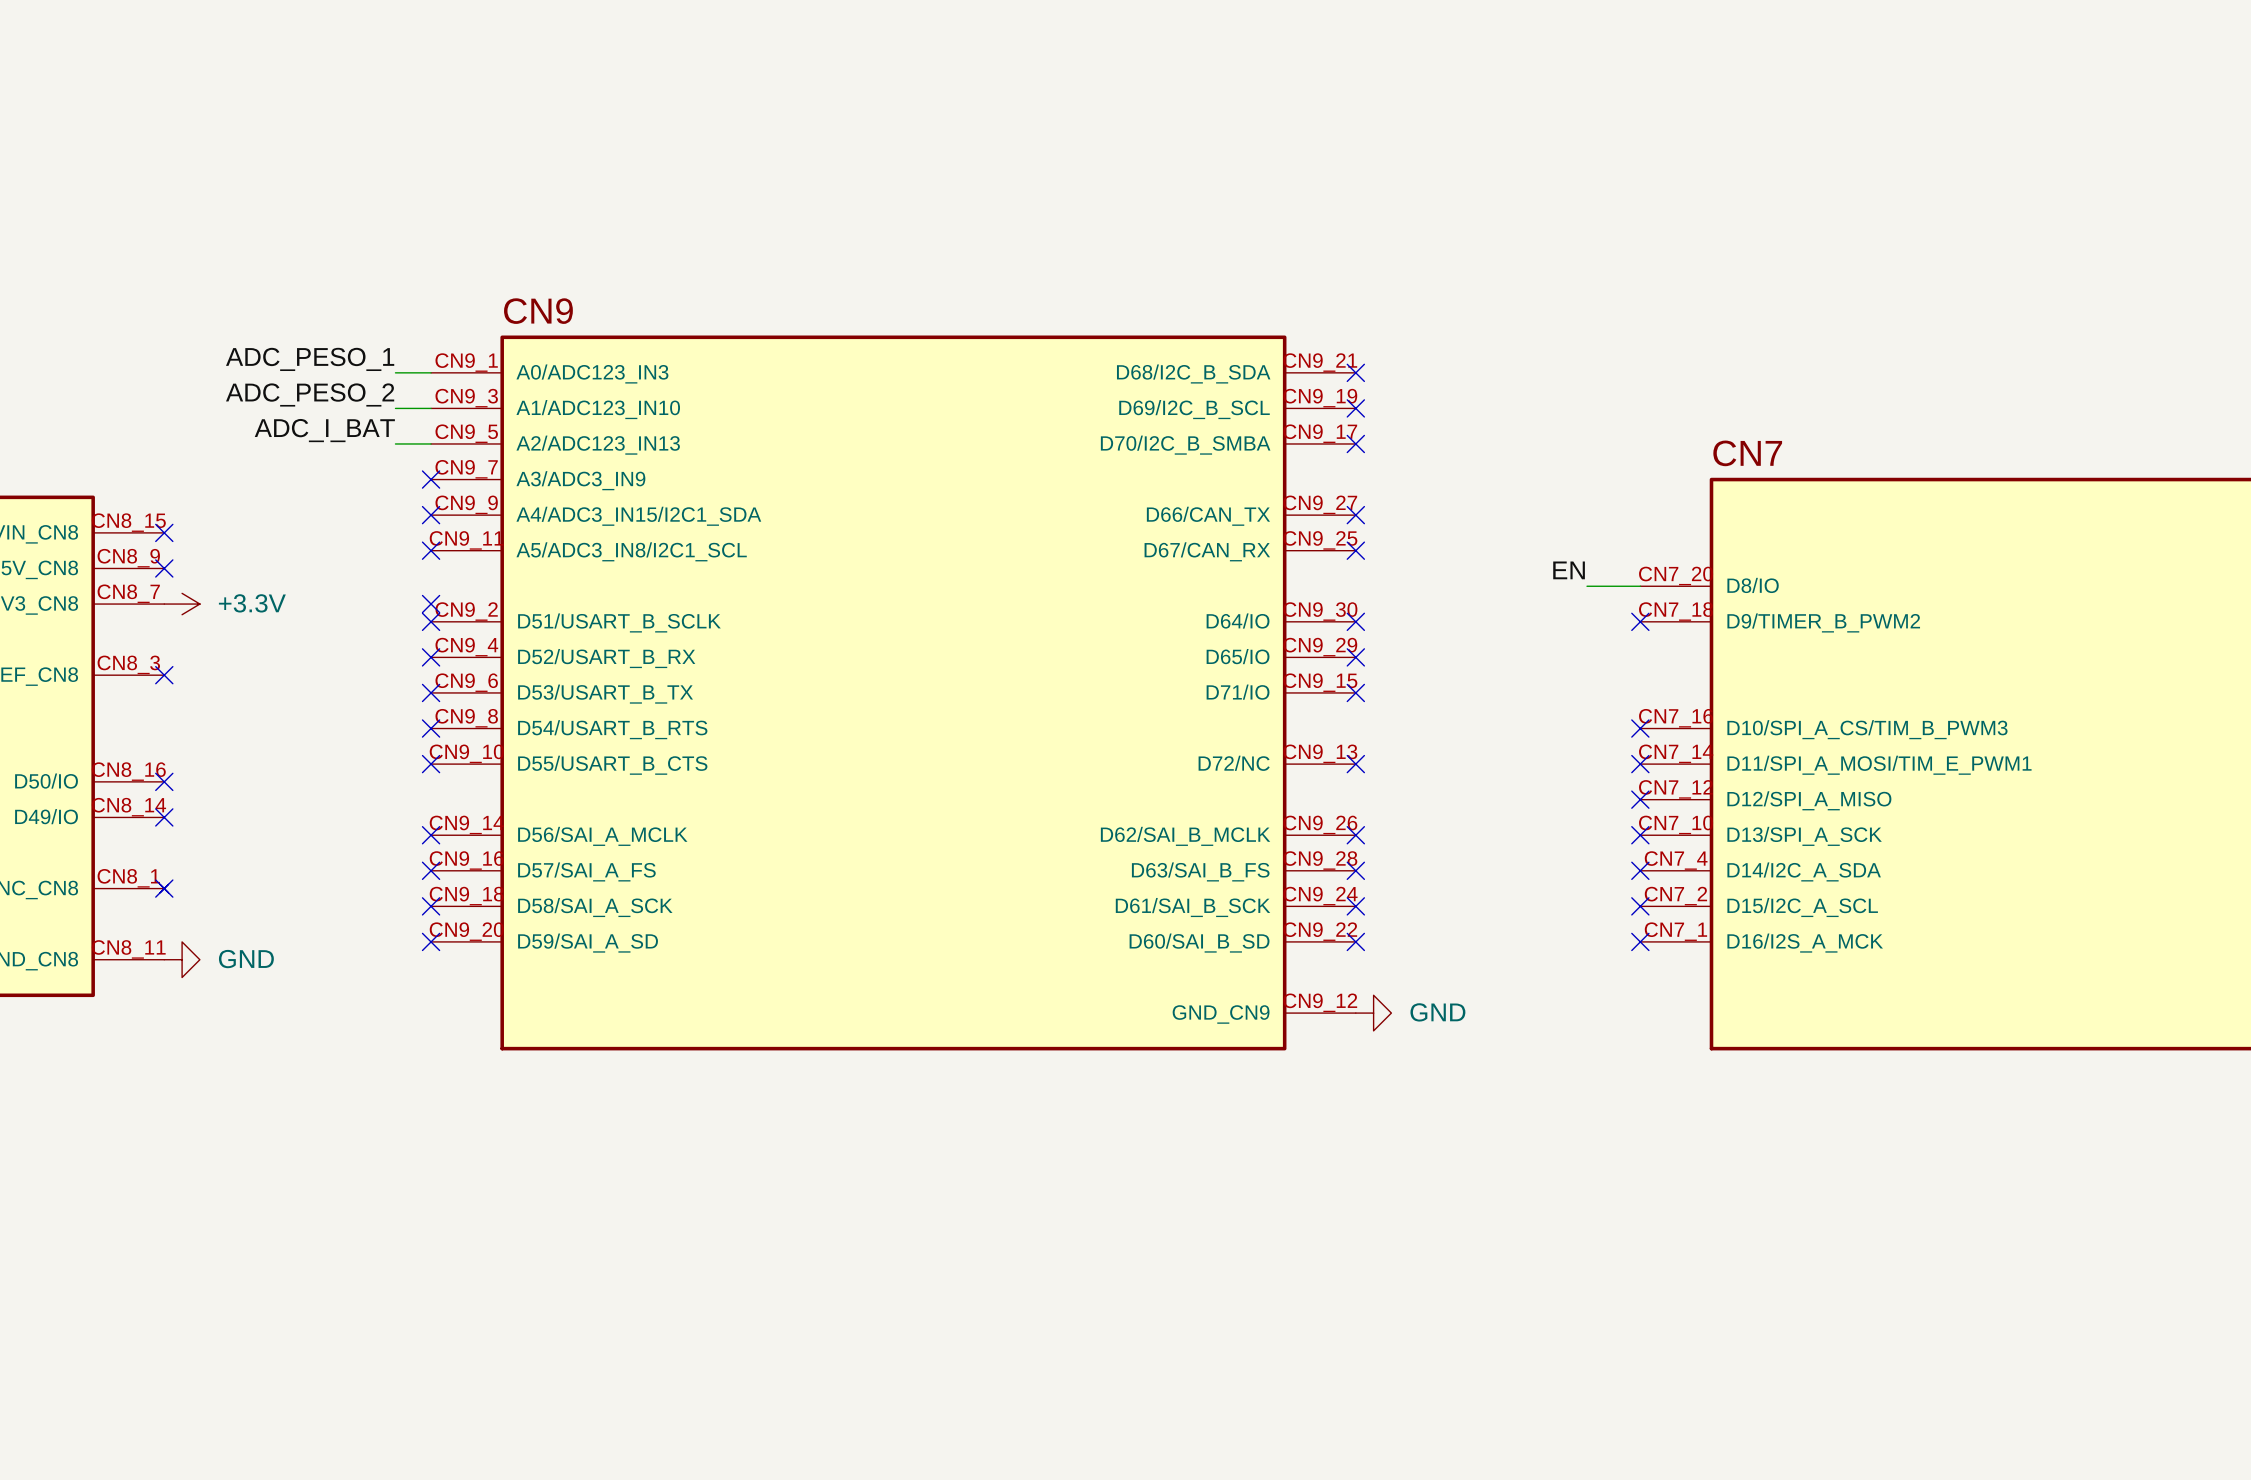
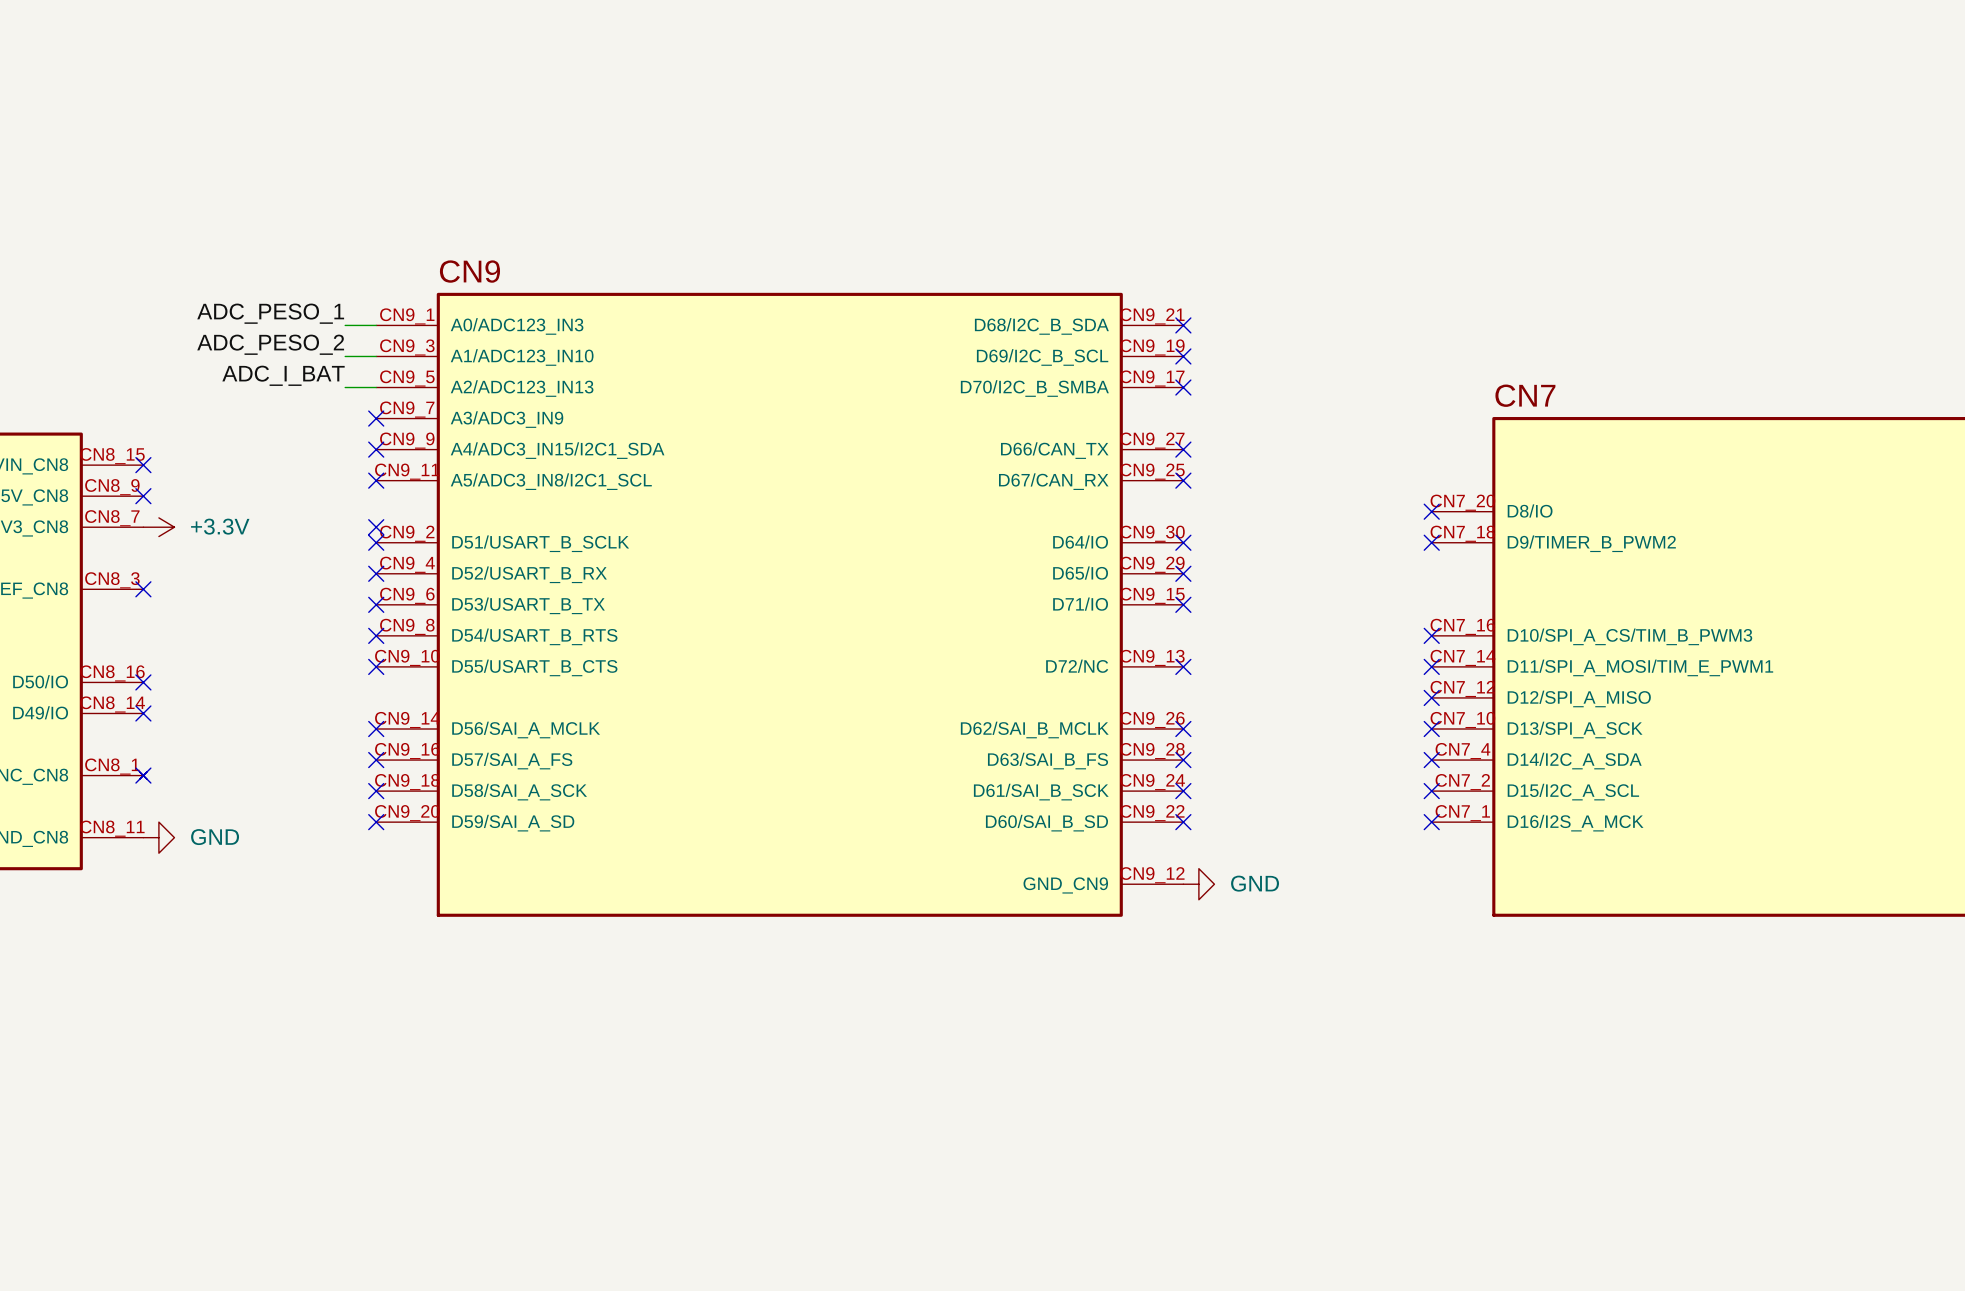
label: EN (1569, 570) -> none
wire: (1587, 586) (1640, 586) -> none
no-connect mark: none -> (1431, 511)

